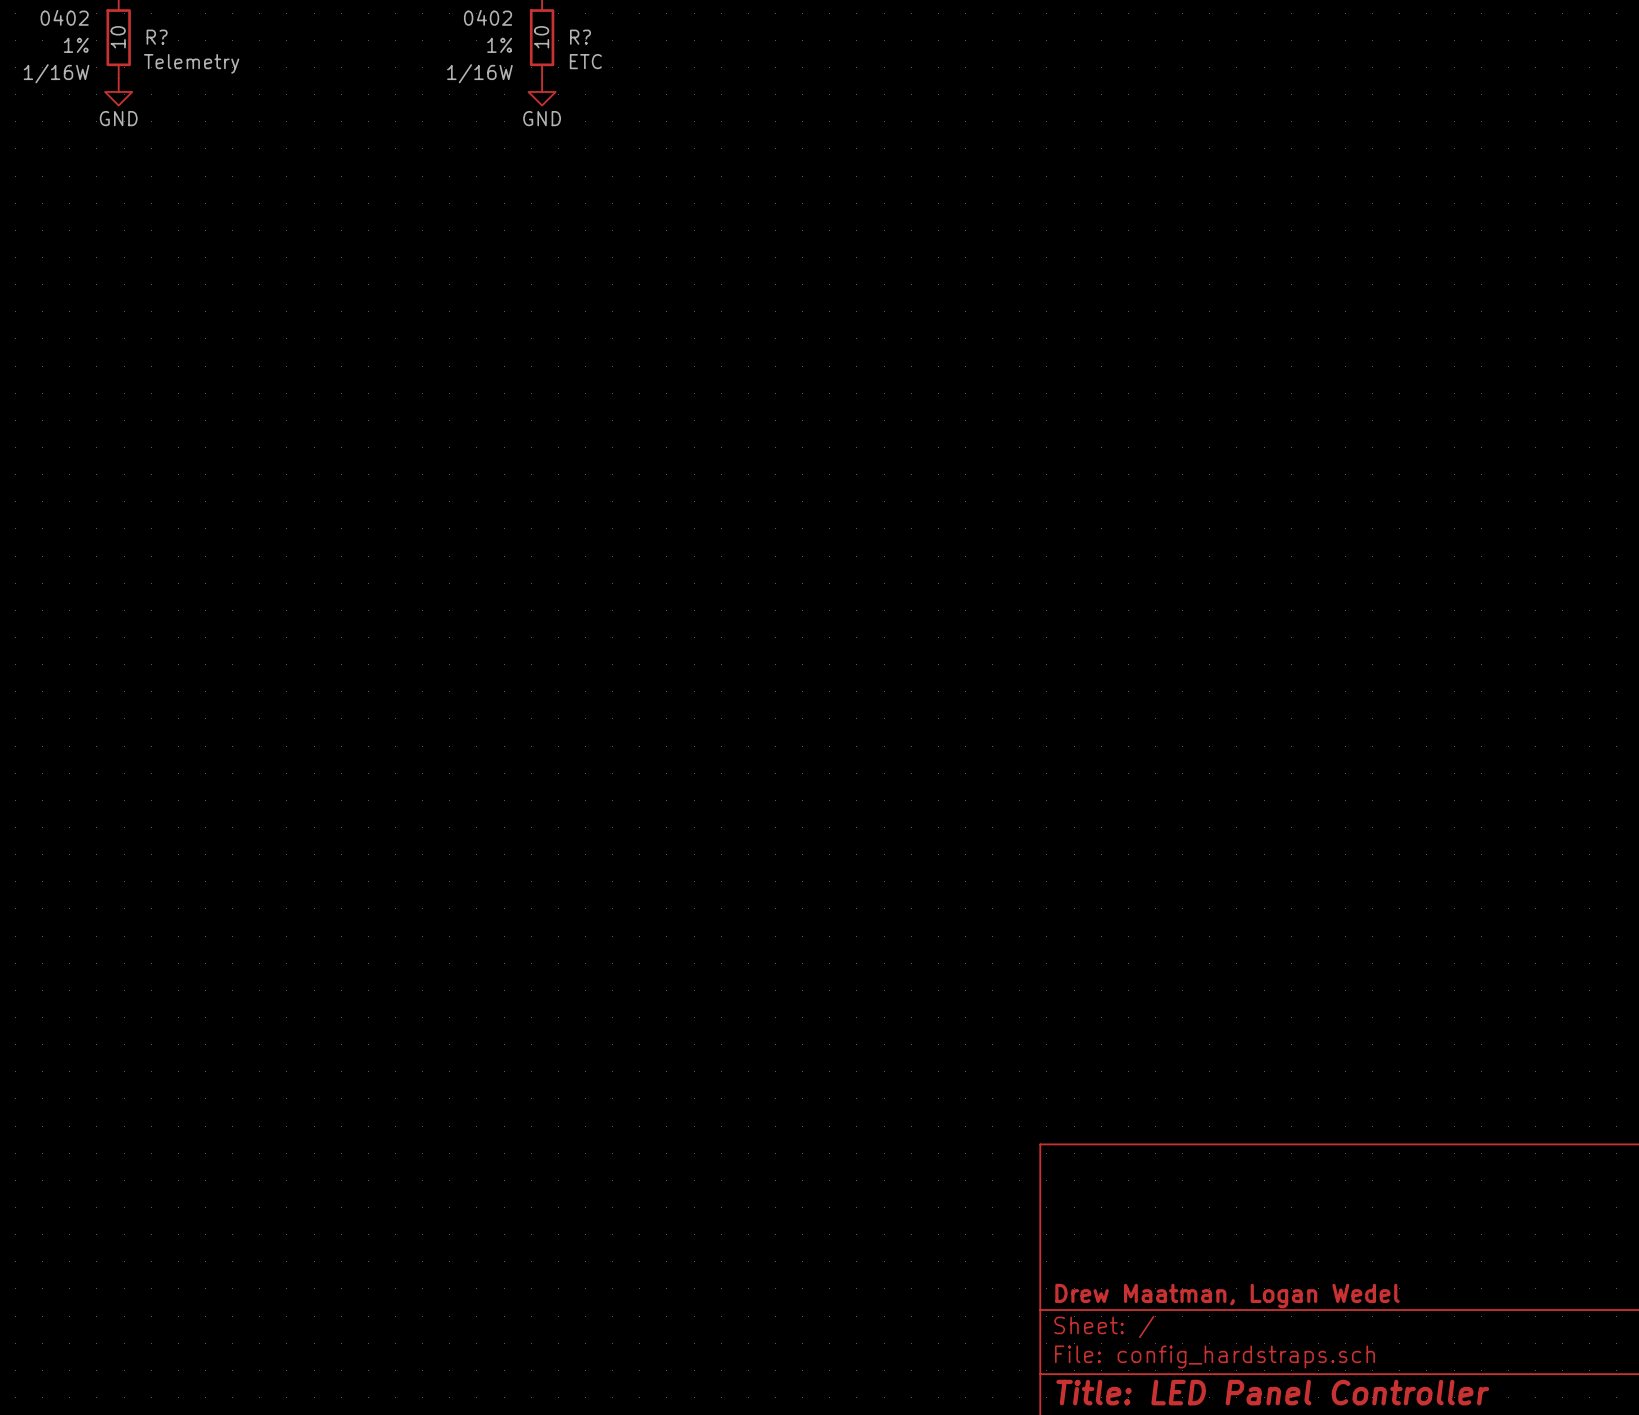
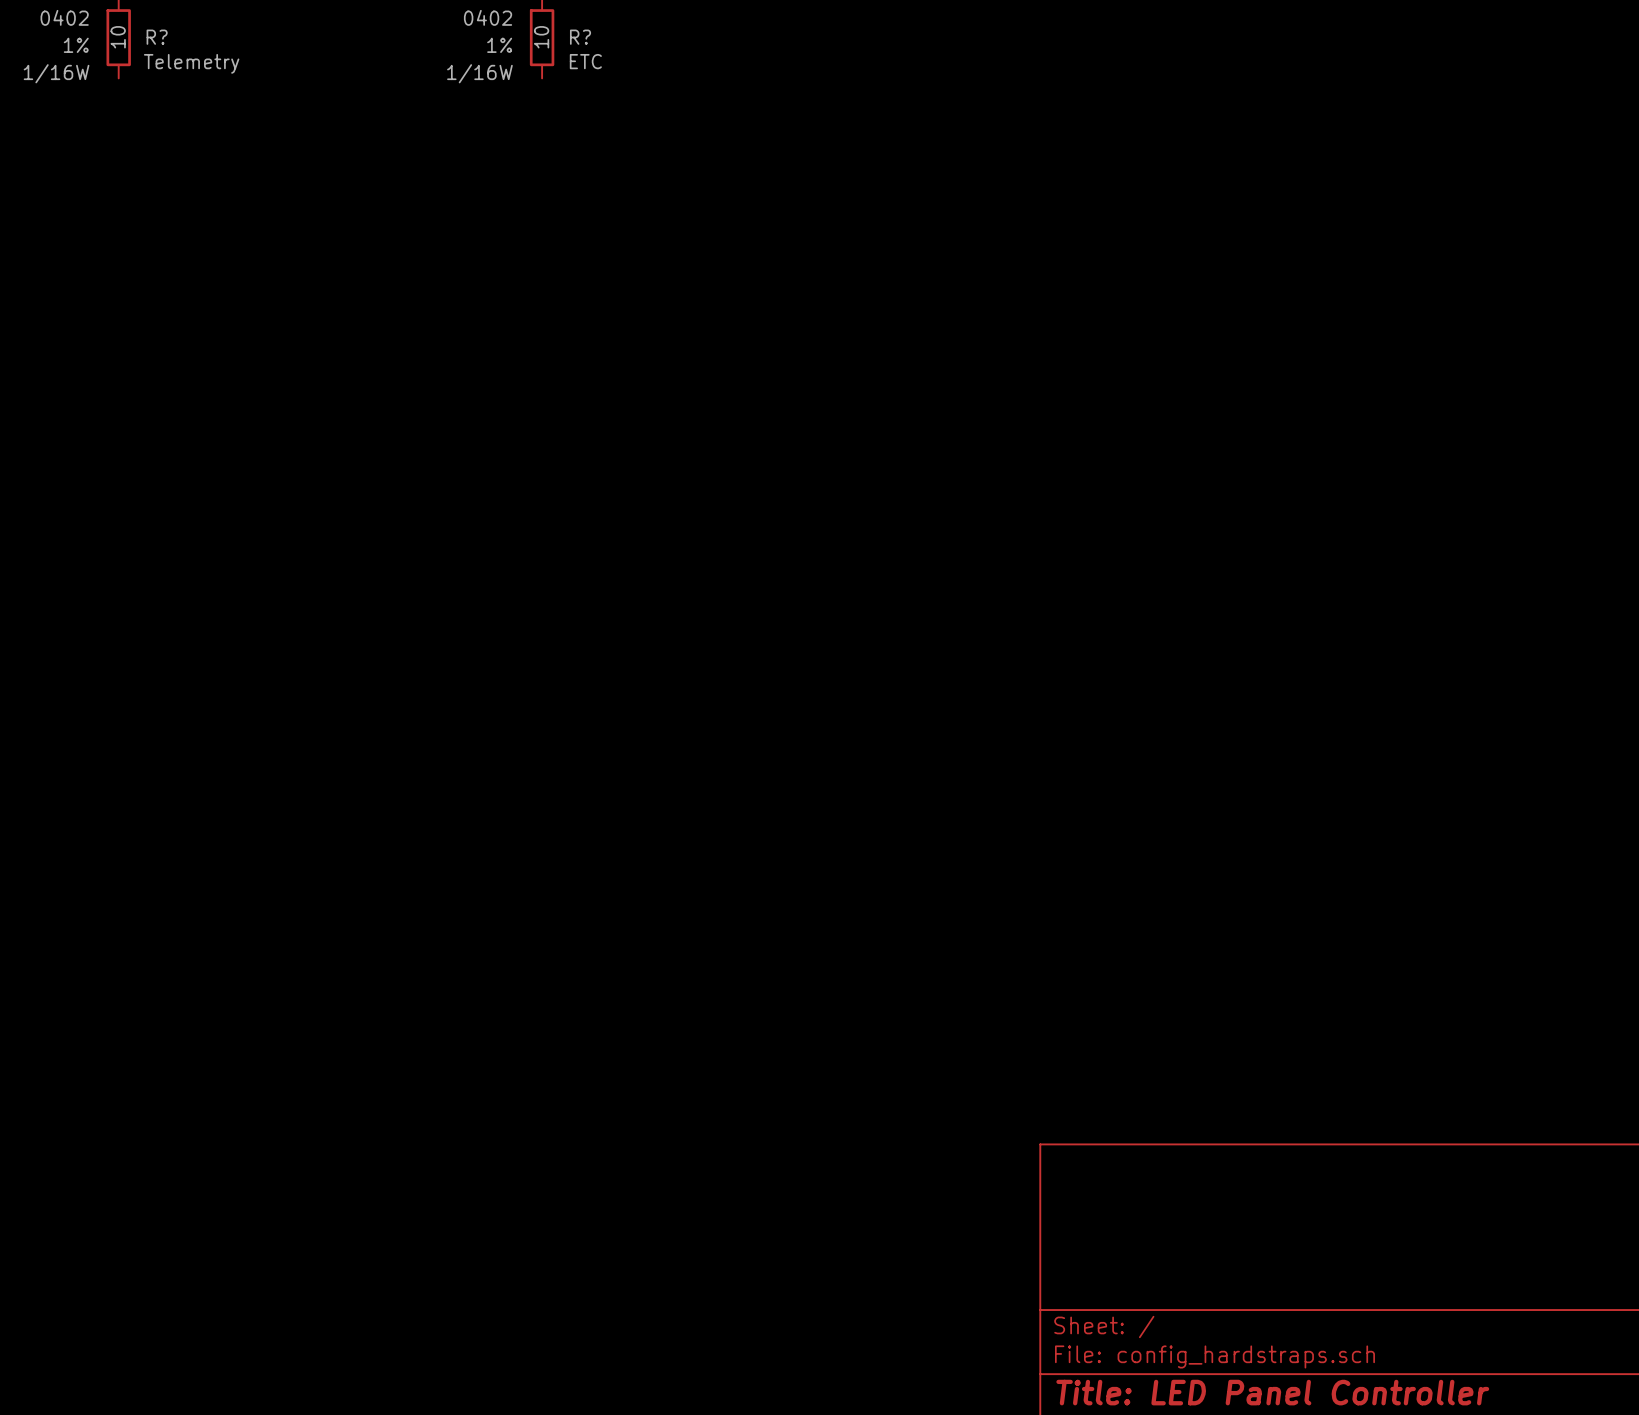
power symbol: GND (118, 91) -> none
power symbol: GND (542, 91) -> none
title block: Drew Maatman, Logan Wedel (1227, 1296) -> none

